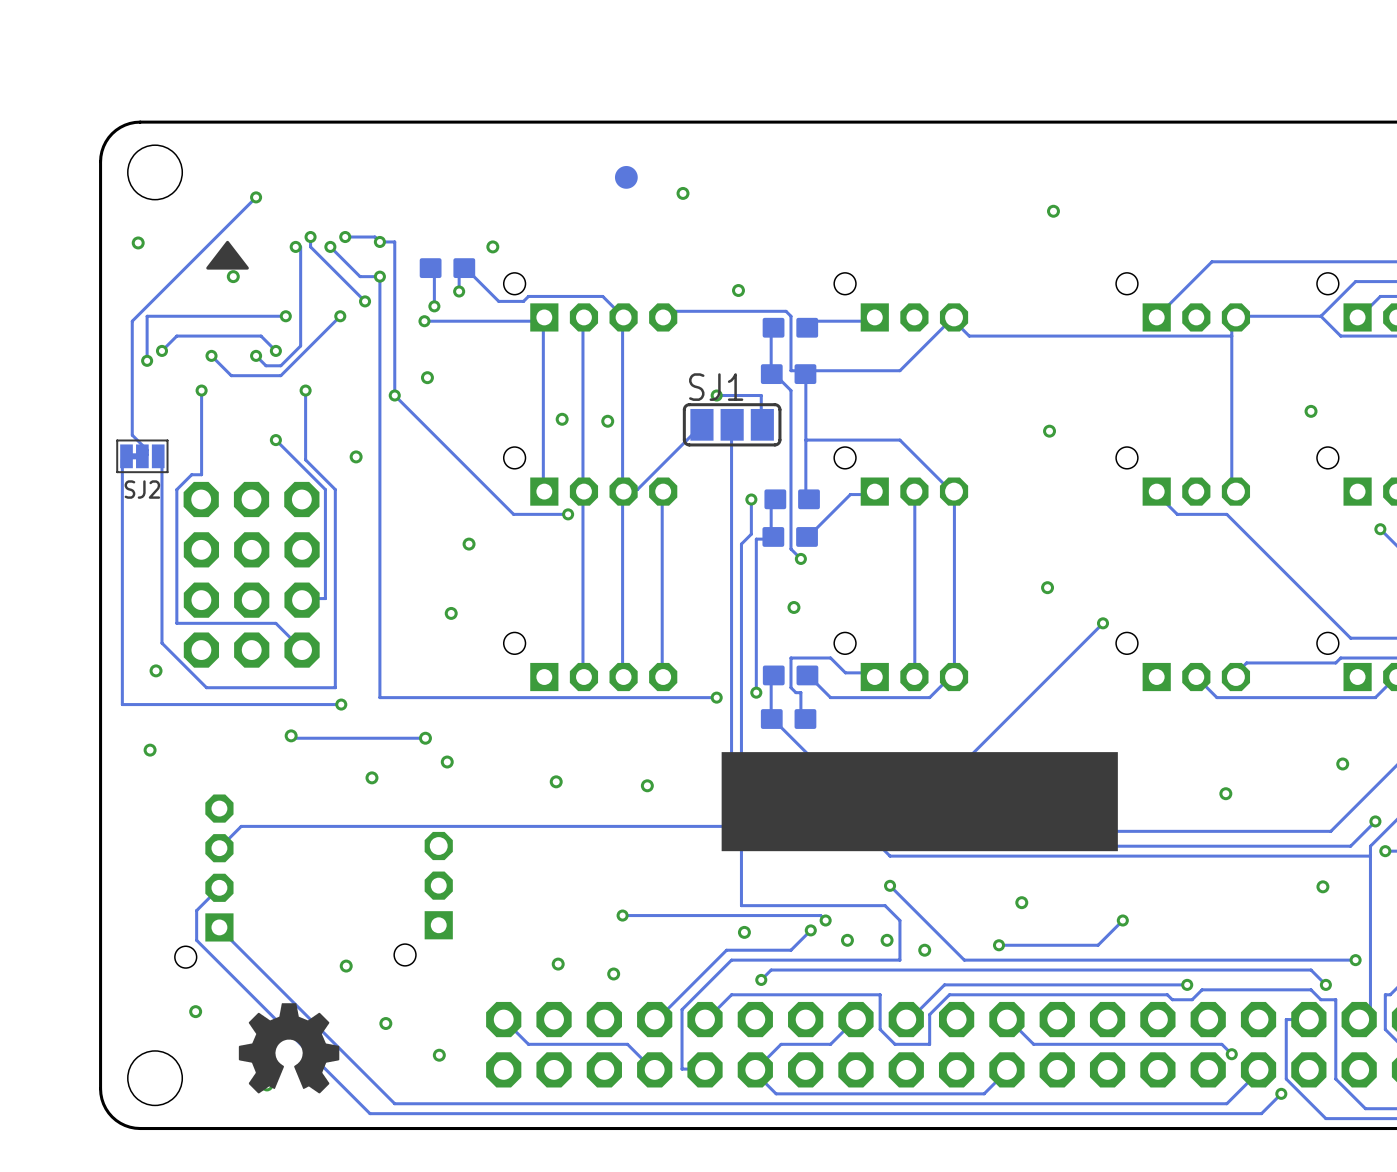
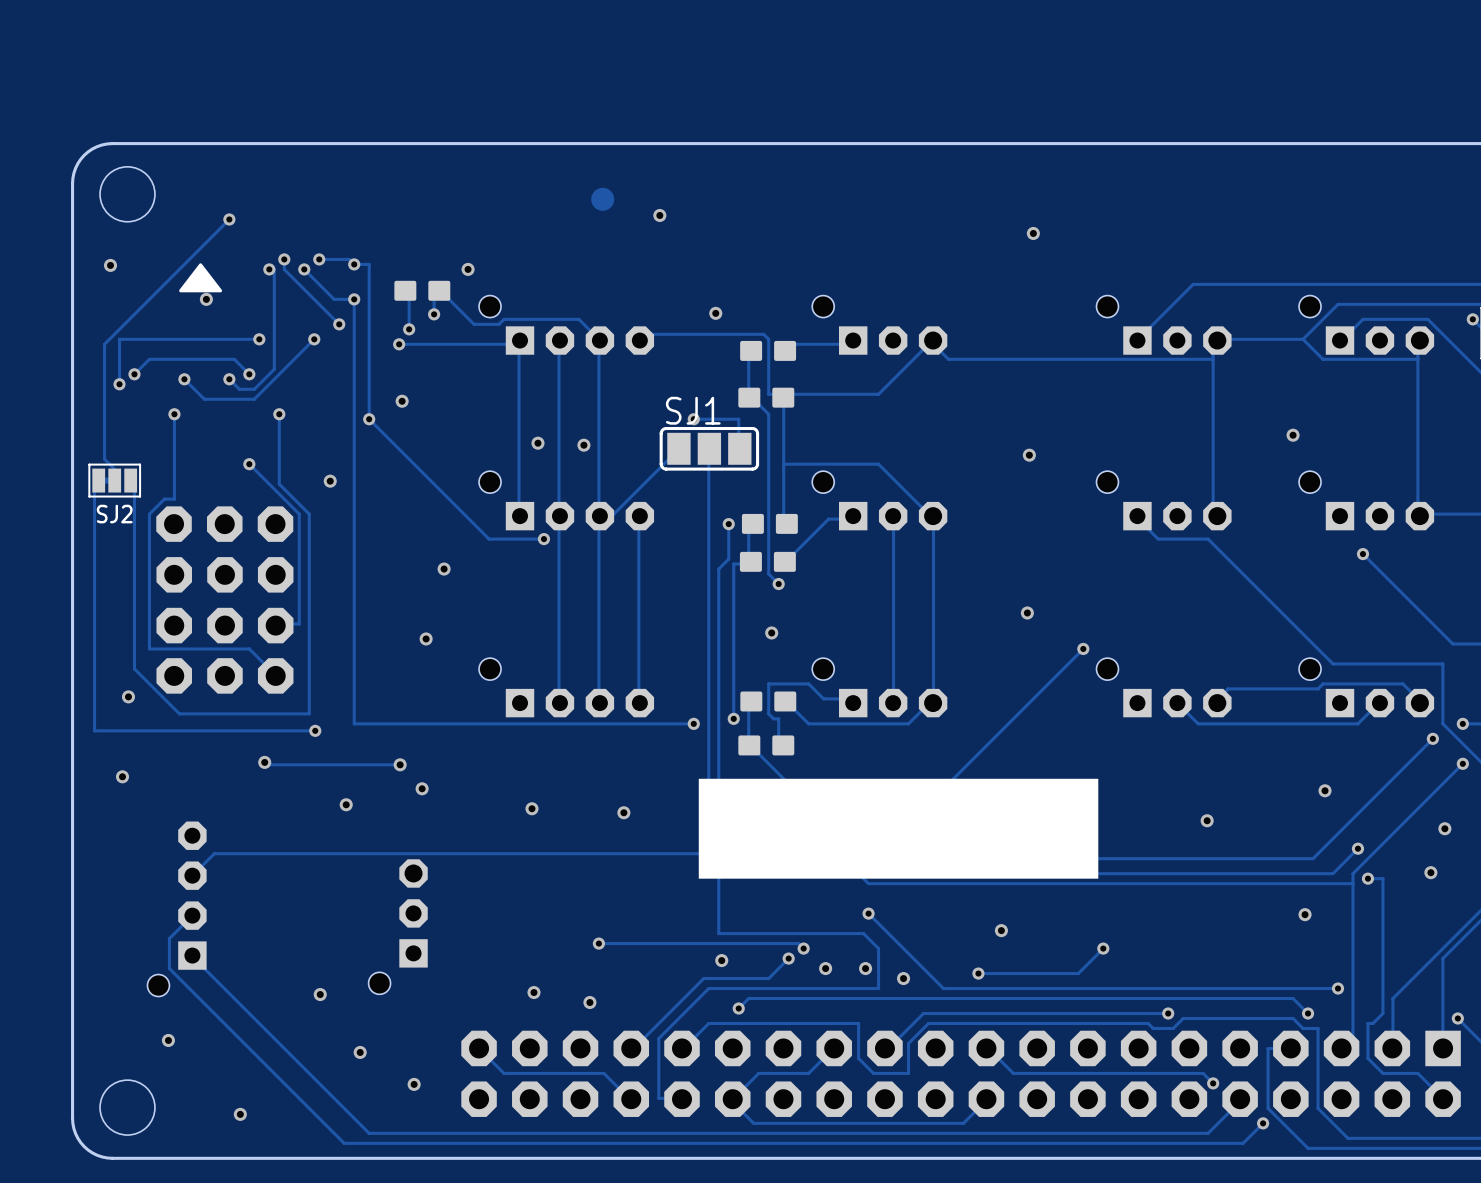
drawing: [238, 1003, 340, 1094] -> none

